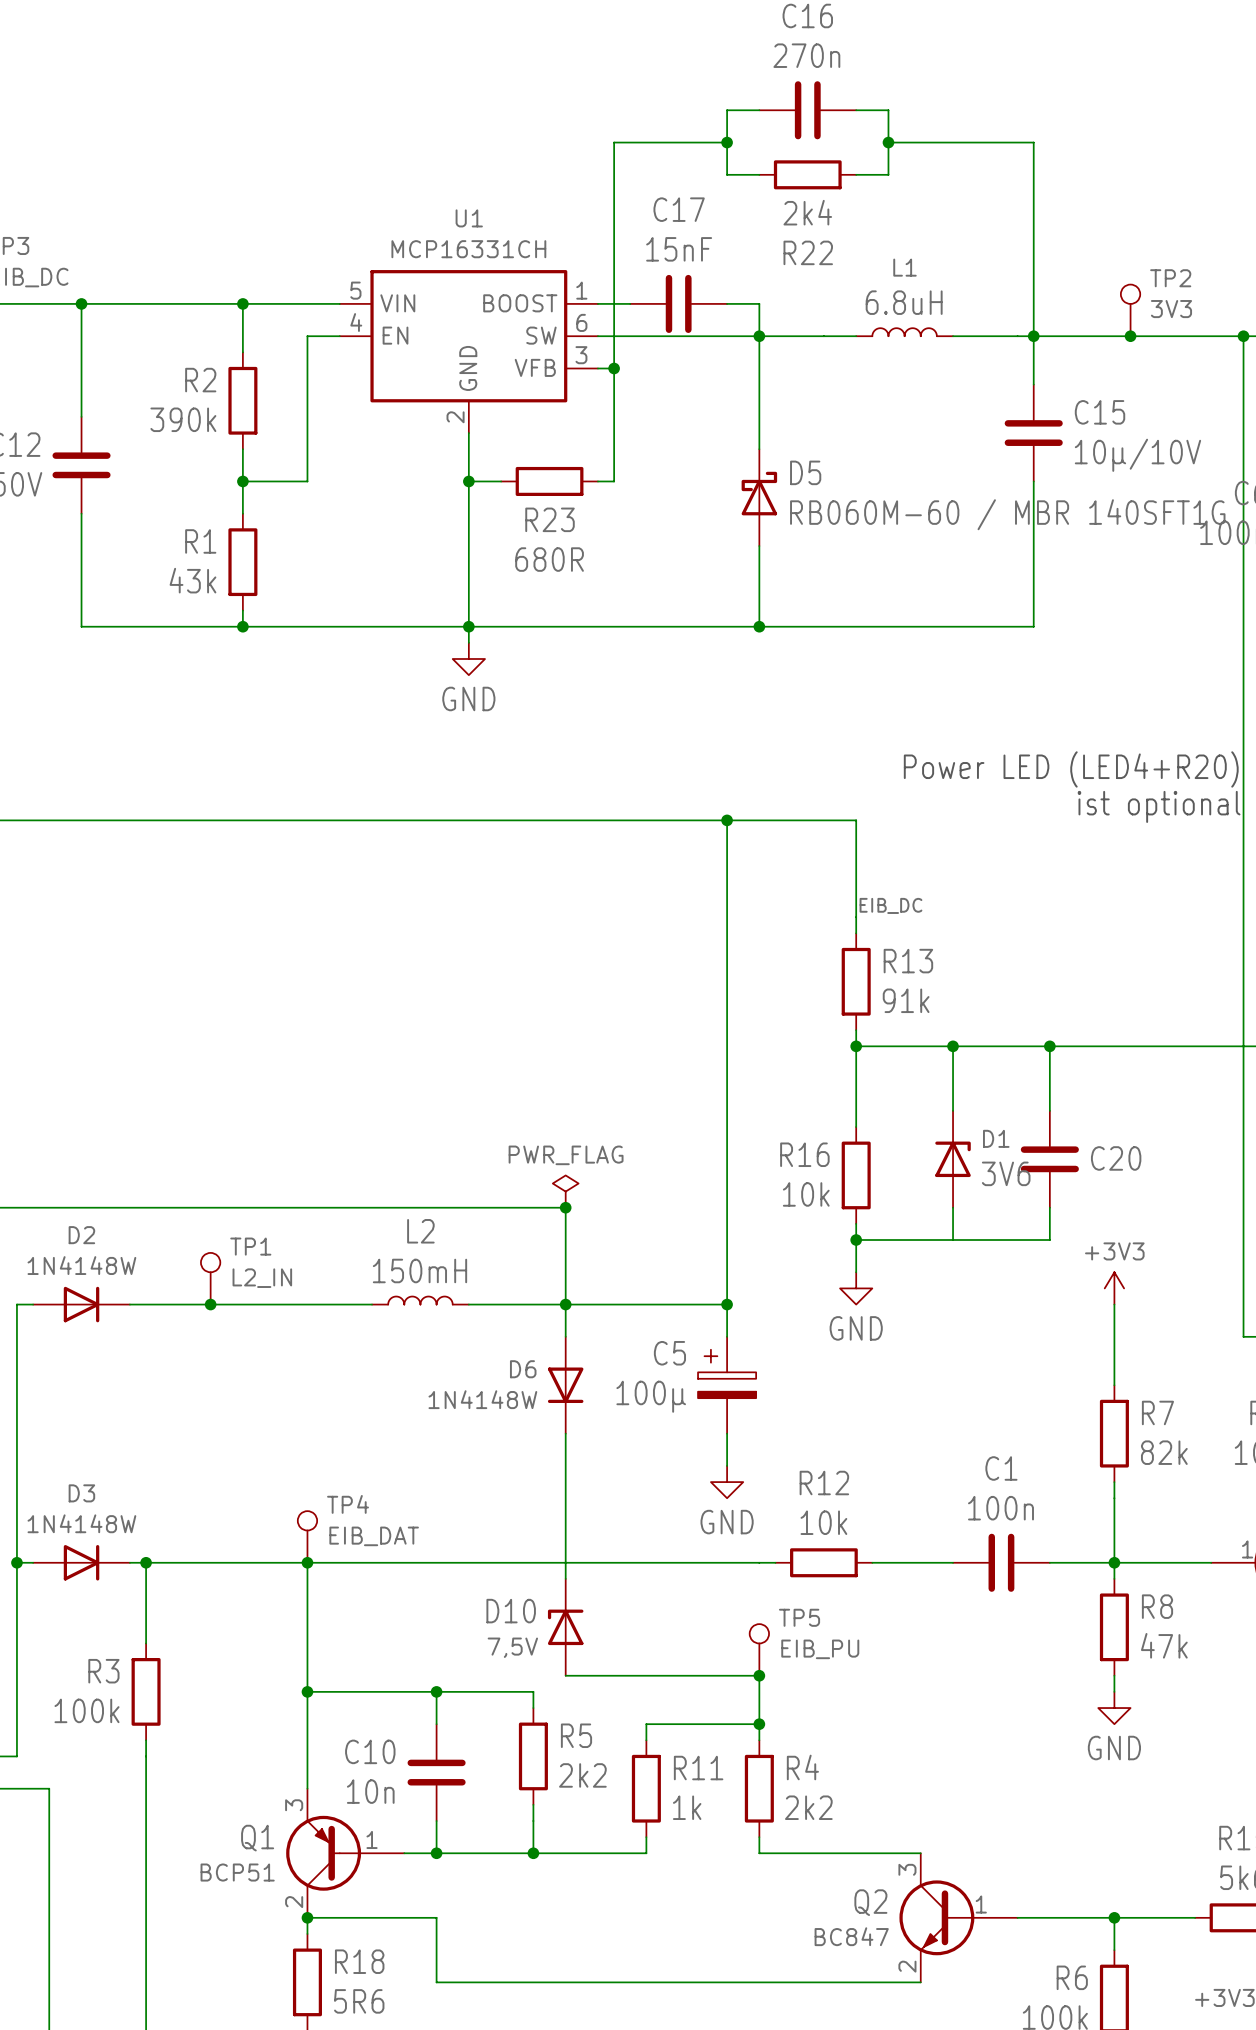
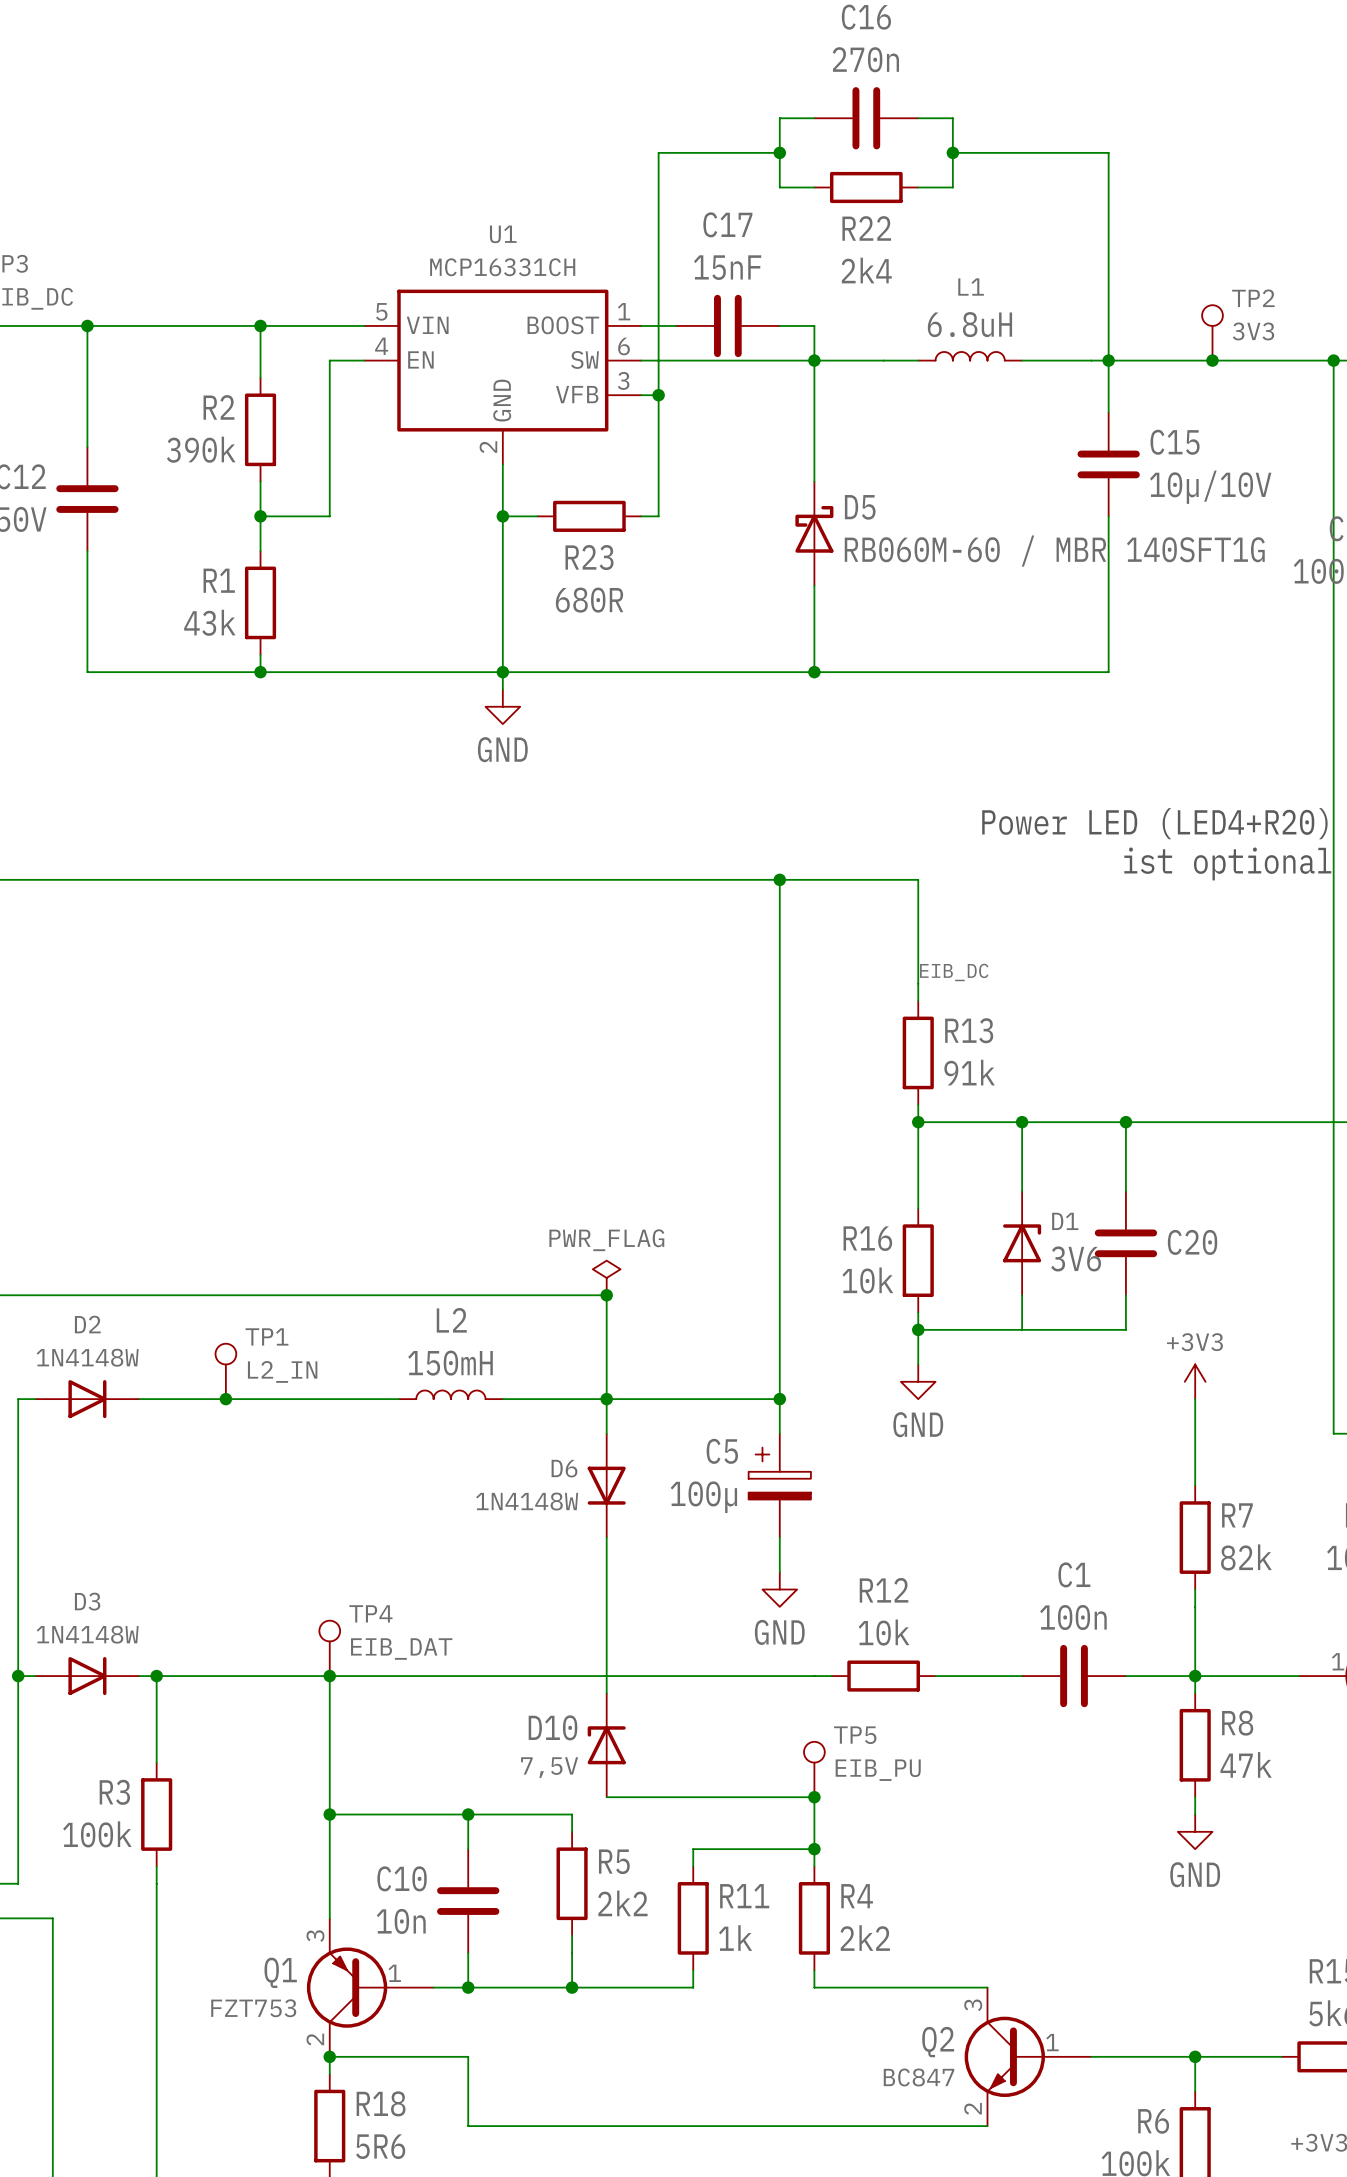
R22 value position: 2k4 (807, 212) -> 2k4 (866, 270)
R22 name position: R22 (808, 252) -> R22 (866, 228)
Q1 symbol: [286, 1788, 405, 1918] -> [306, 1918, 434, 2057]
Q1 value: BCP51 (237, 1872) -> FZT753 (253, 2008)

